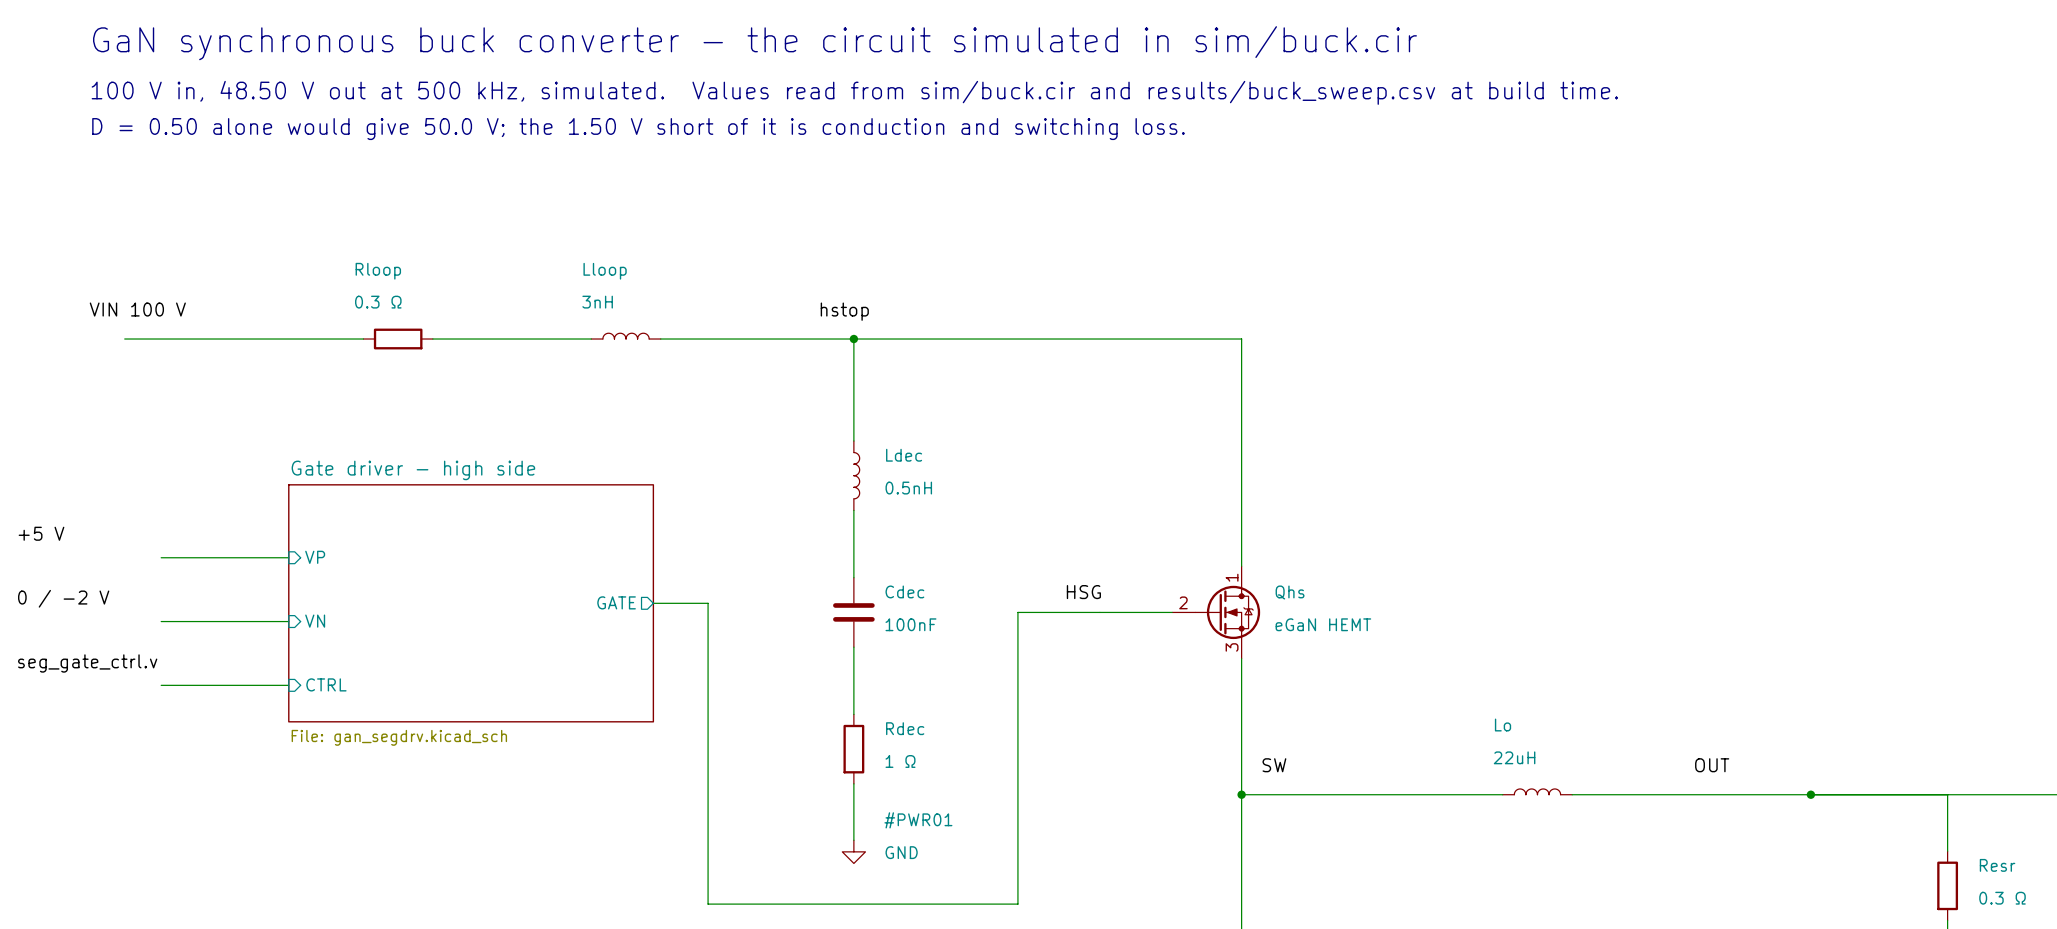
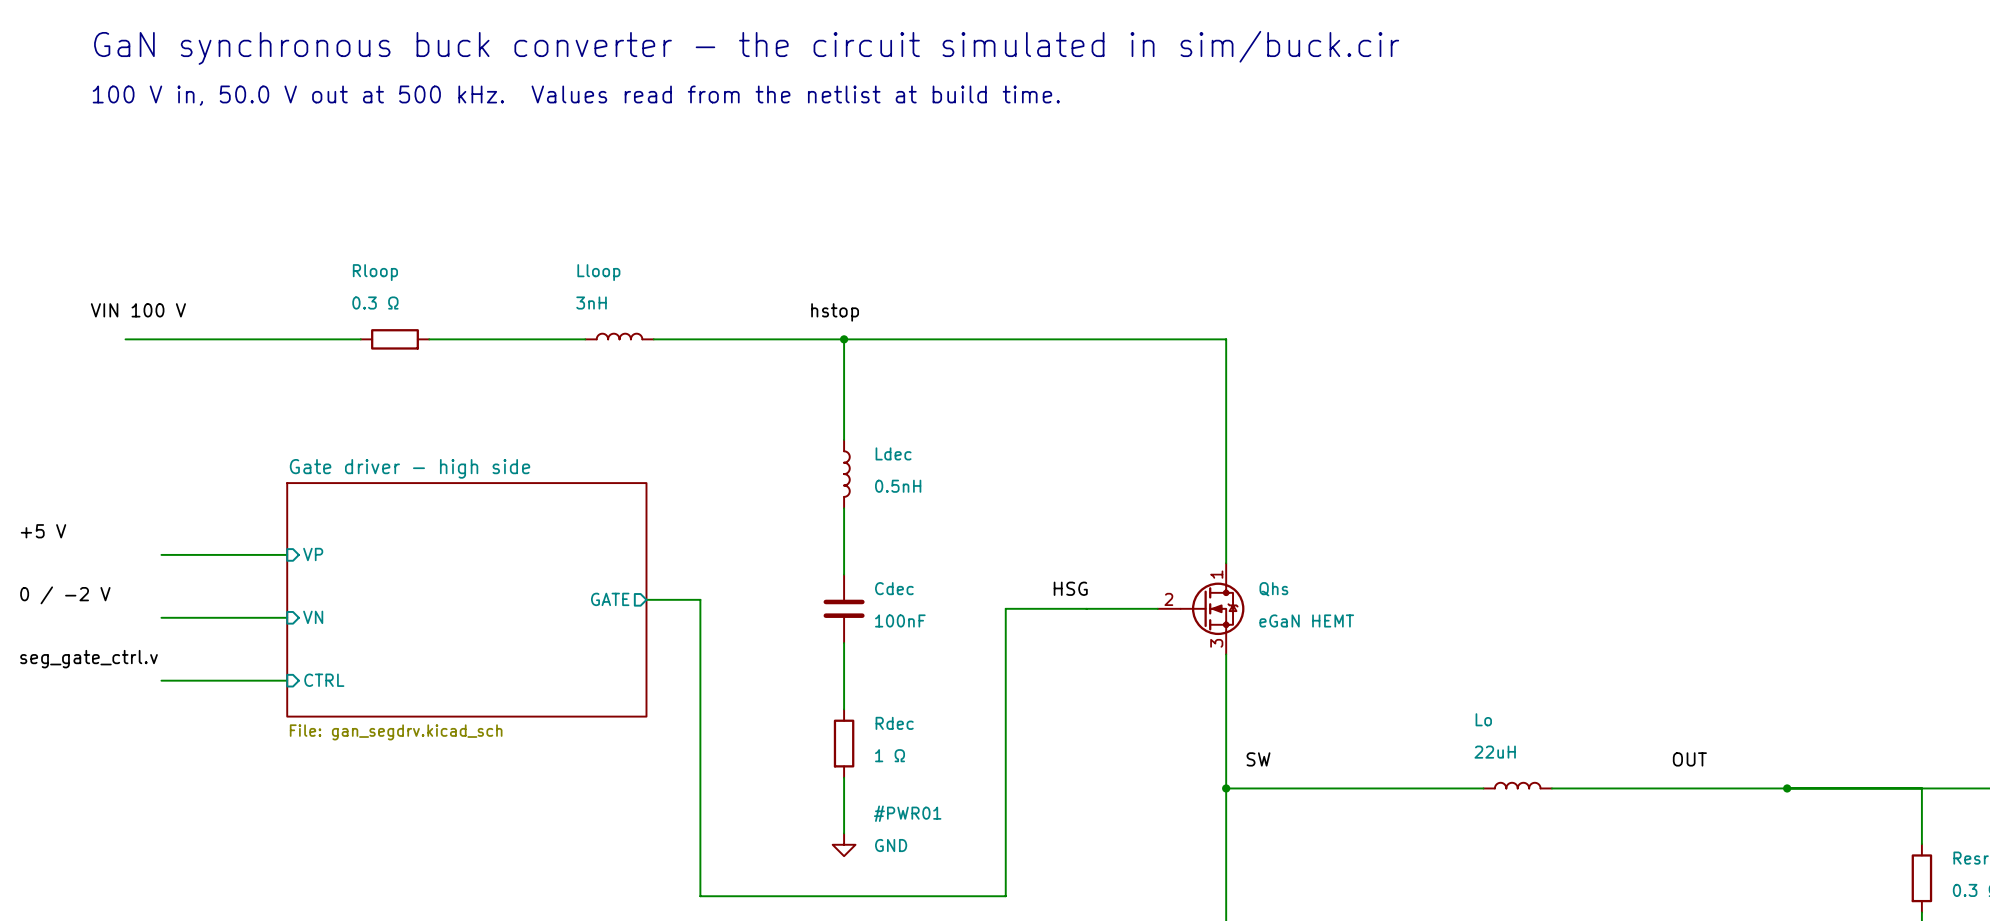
text: 100 V in, 48.50 V out at 500 kHz, simulated. Values read from sim/buck.cir and results/buck_sweep.csv at build time. (854, 92) -> 100 V in, 50.0 V out at 500 kHz. Values read from the netlist at build time. (576, 95)
text: D = 0.50 alone would give 50.0 V; the 1.50 V short of it is conduction and switching loss. (638, 129) -> none

